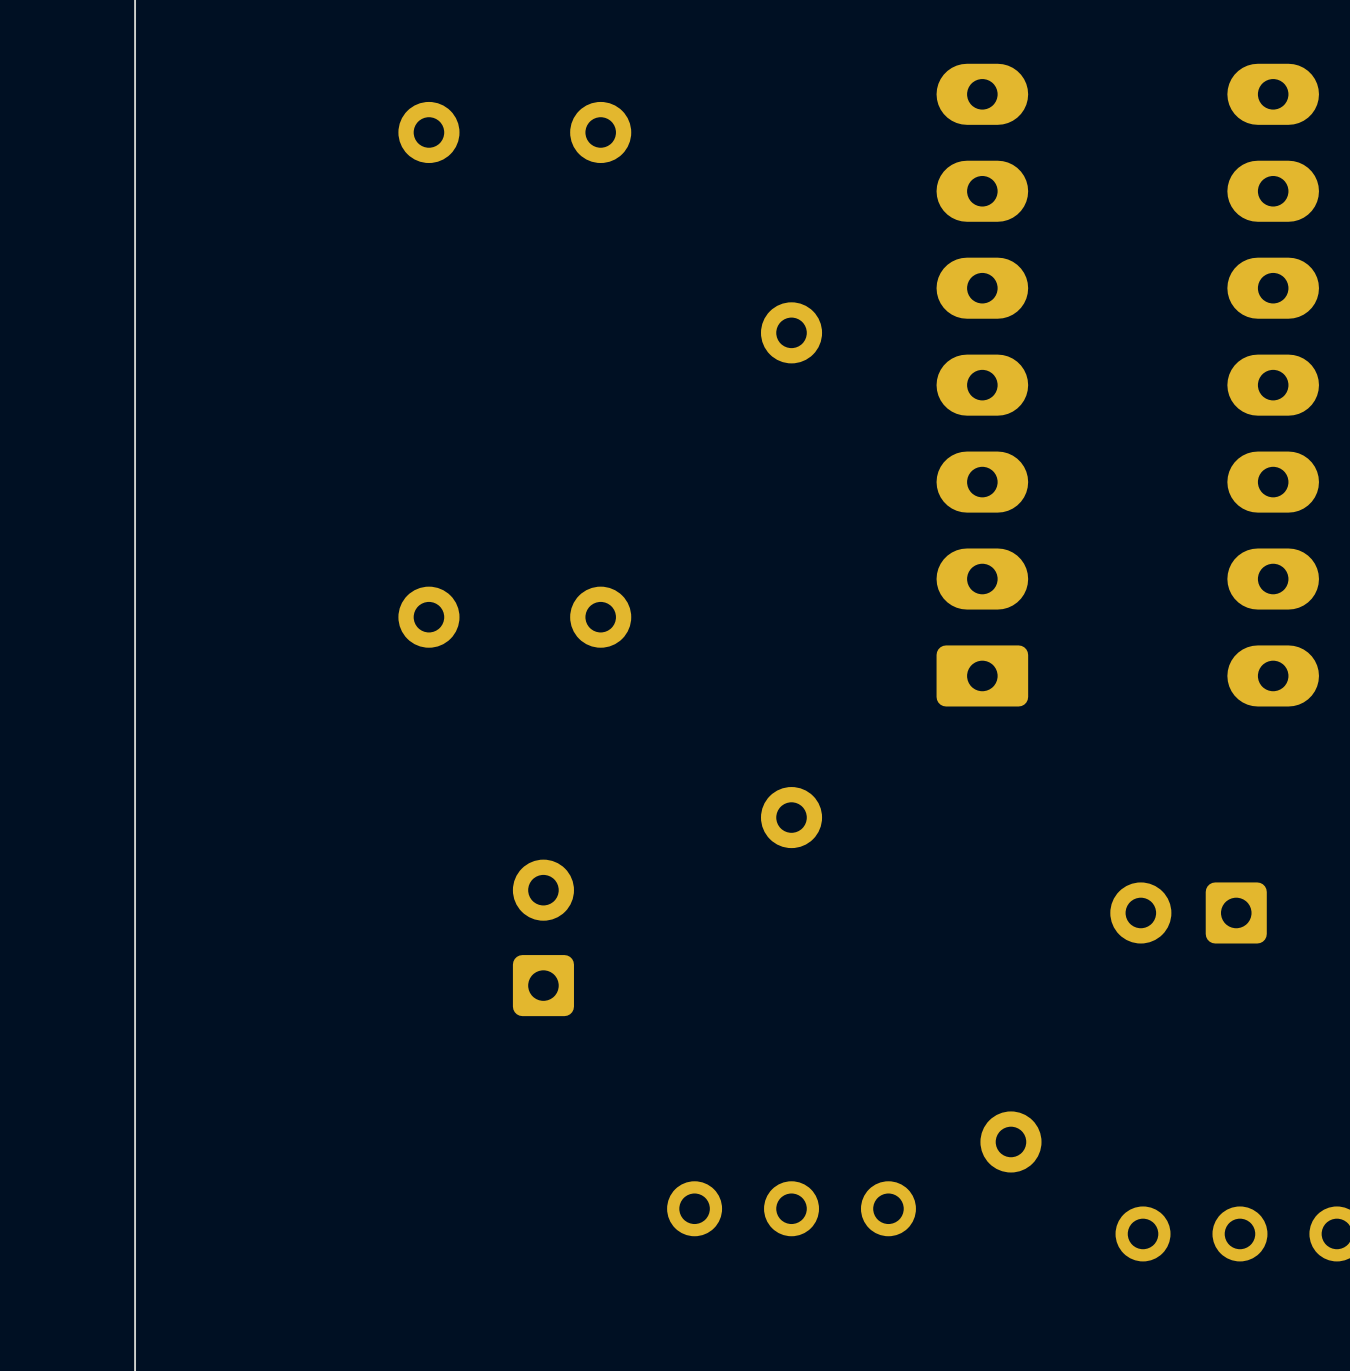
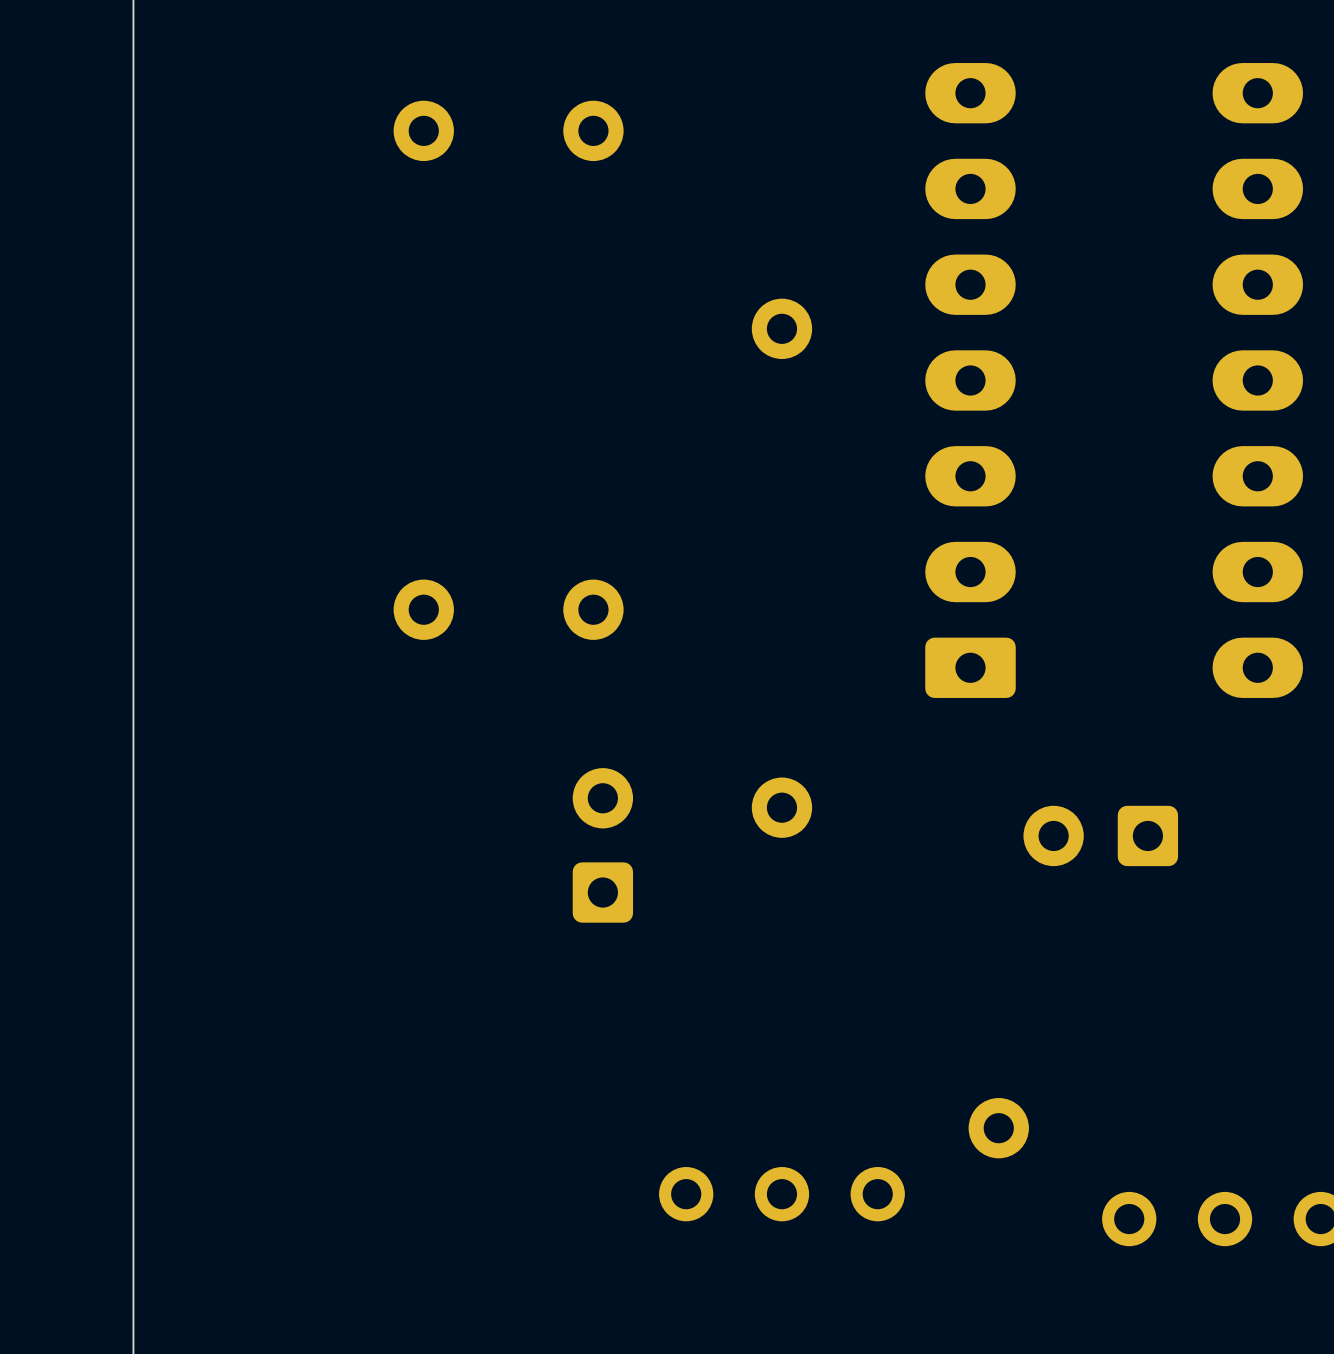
part position: (1188, 912) -> (1100, 835)
part position: (543, 937) -> (602, 845)

